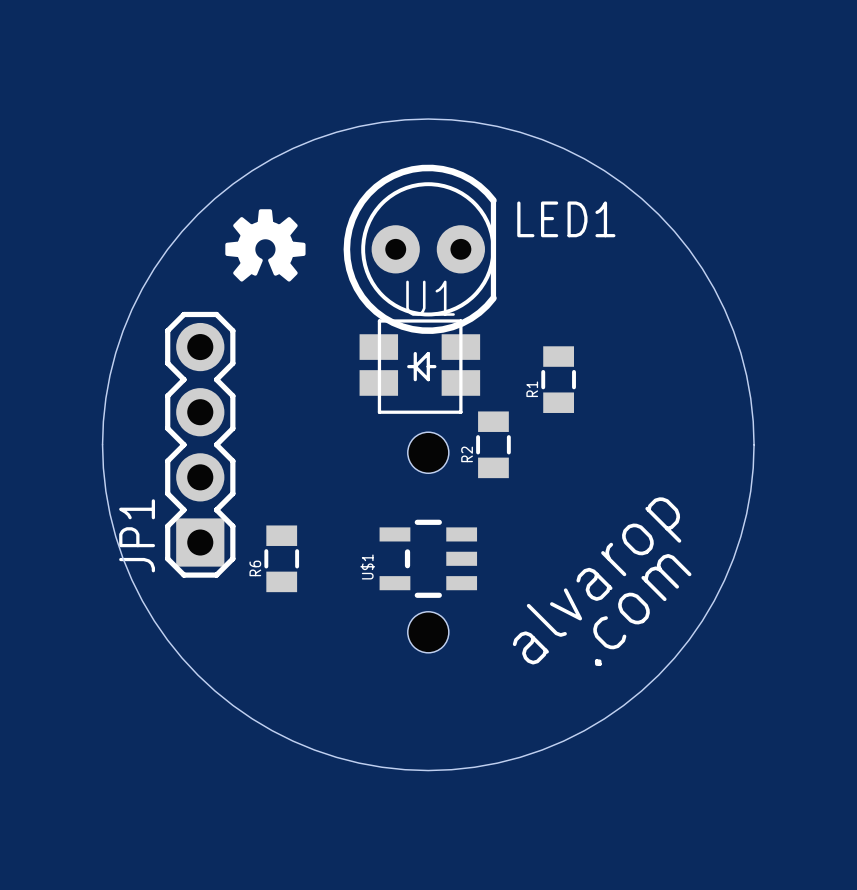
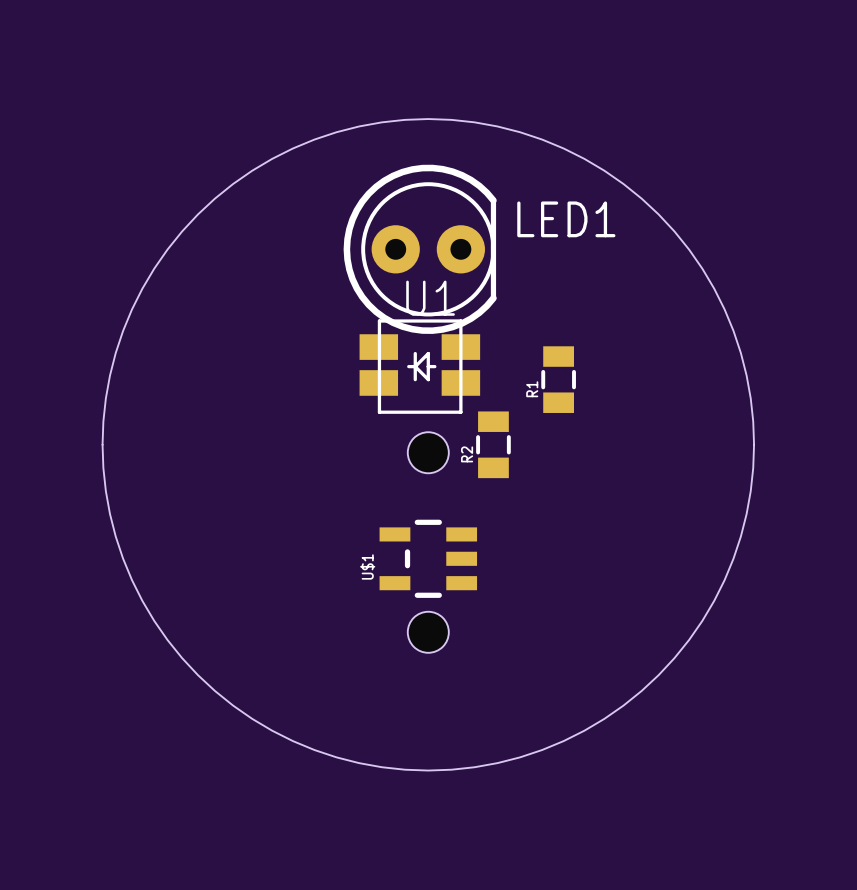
drawing: [225, 209, 306, 282] -> none
JP1: (200, 444) -> none
R6: (281, 558) -> none
text: alvarop (597, 580) -> none
text: .com (642, 610) -> none

